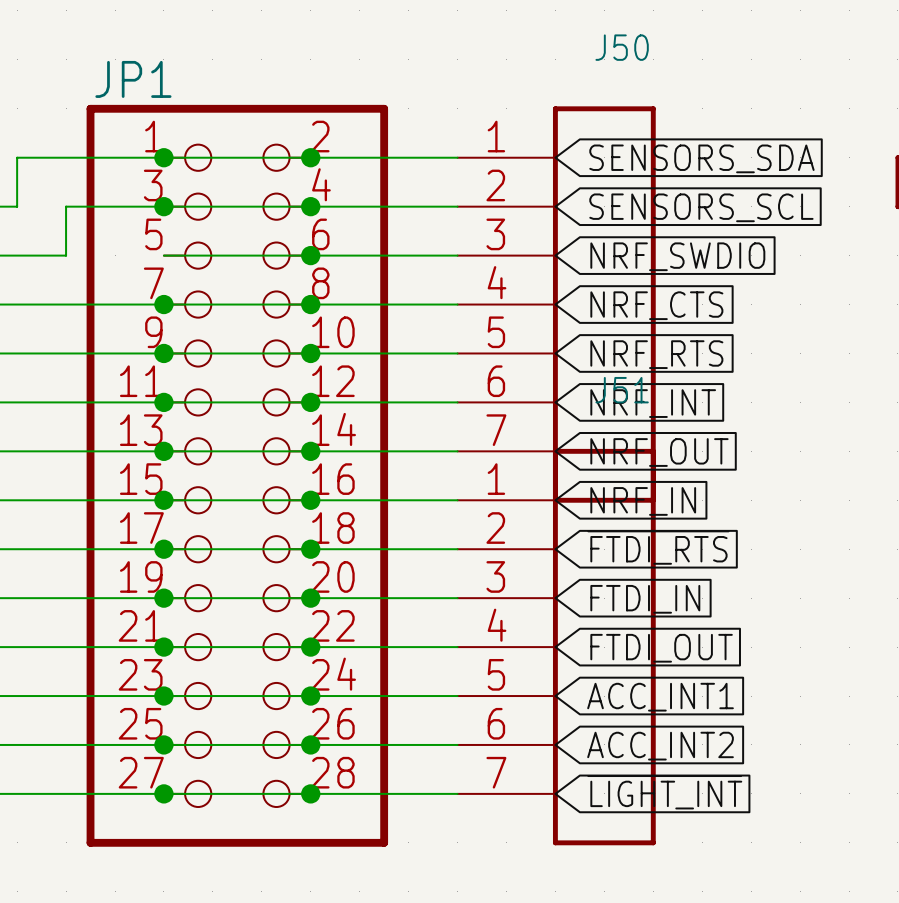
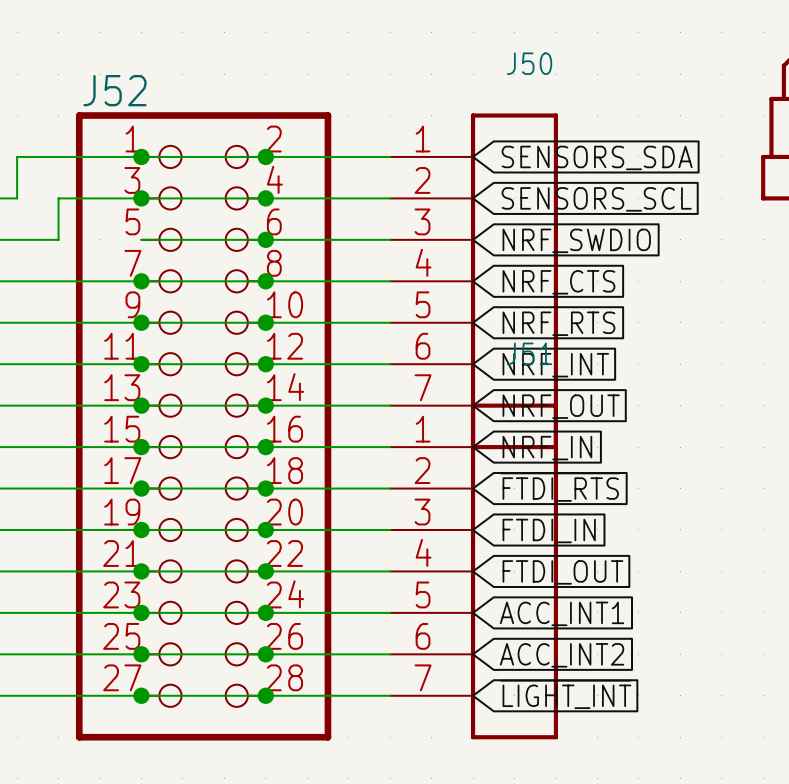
JP1 name: JP1 (133, 79) -> J52 (114, 90)

